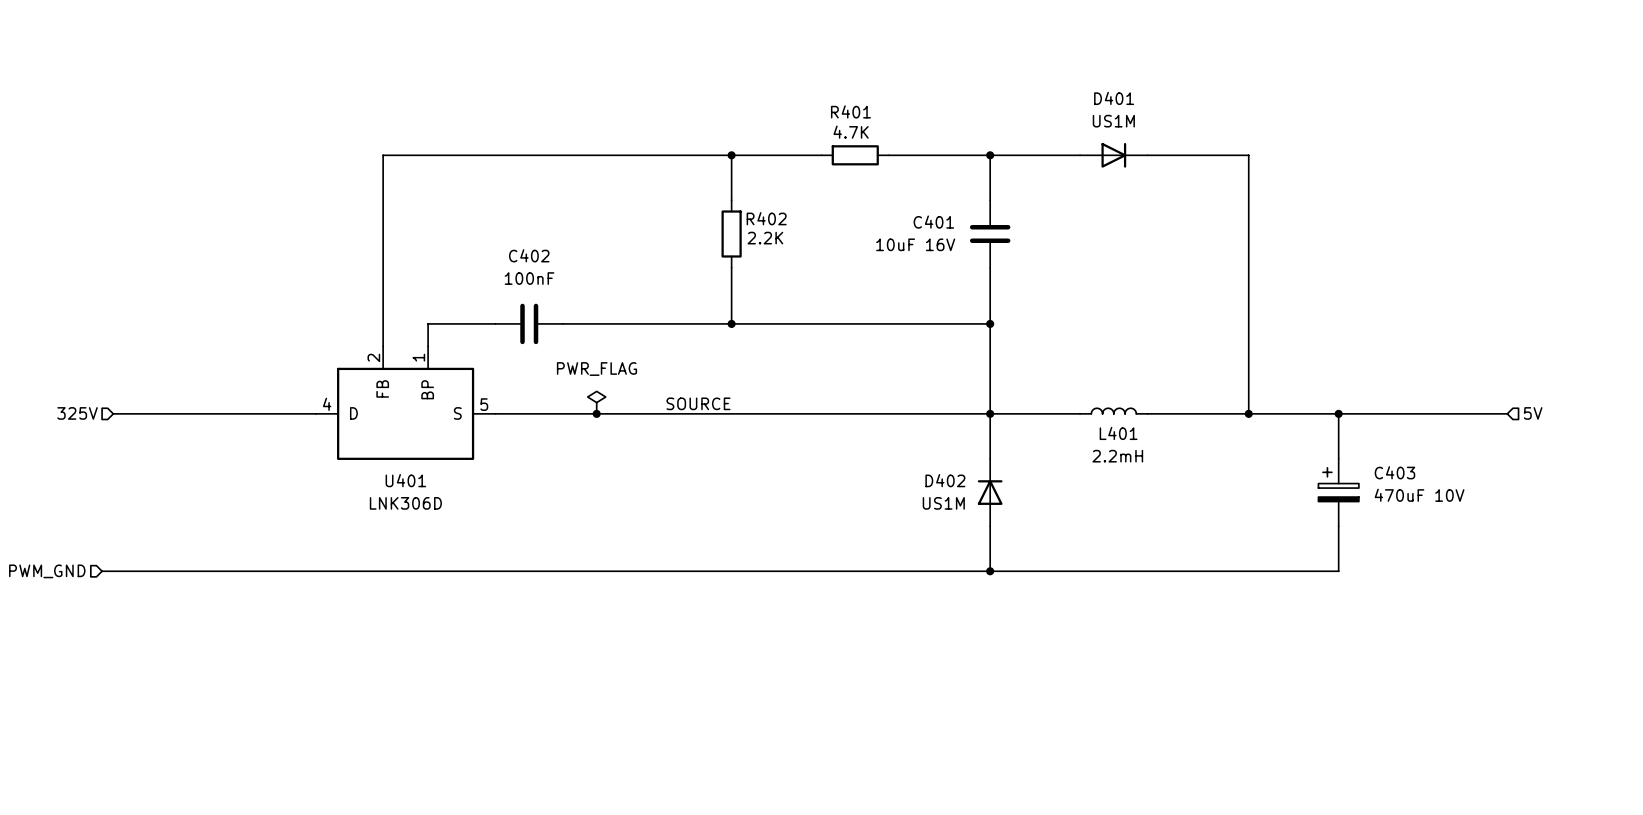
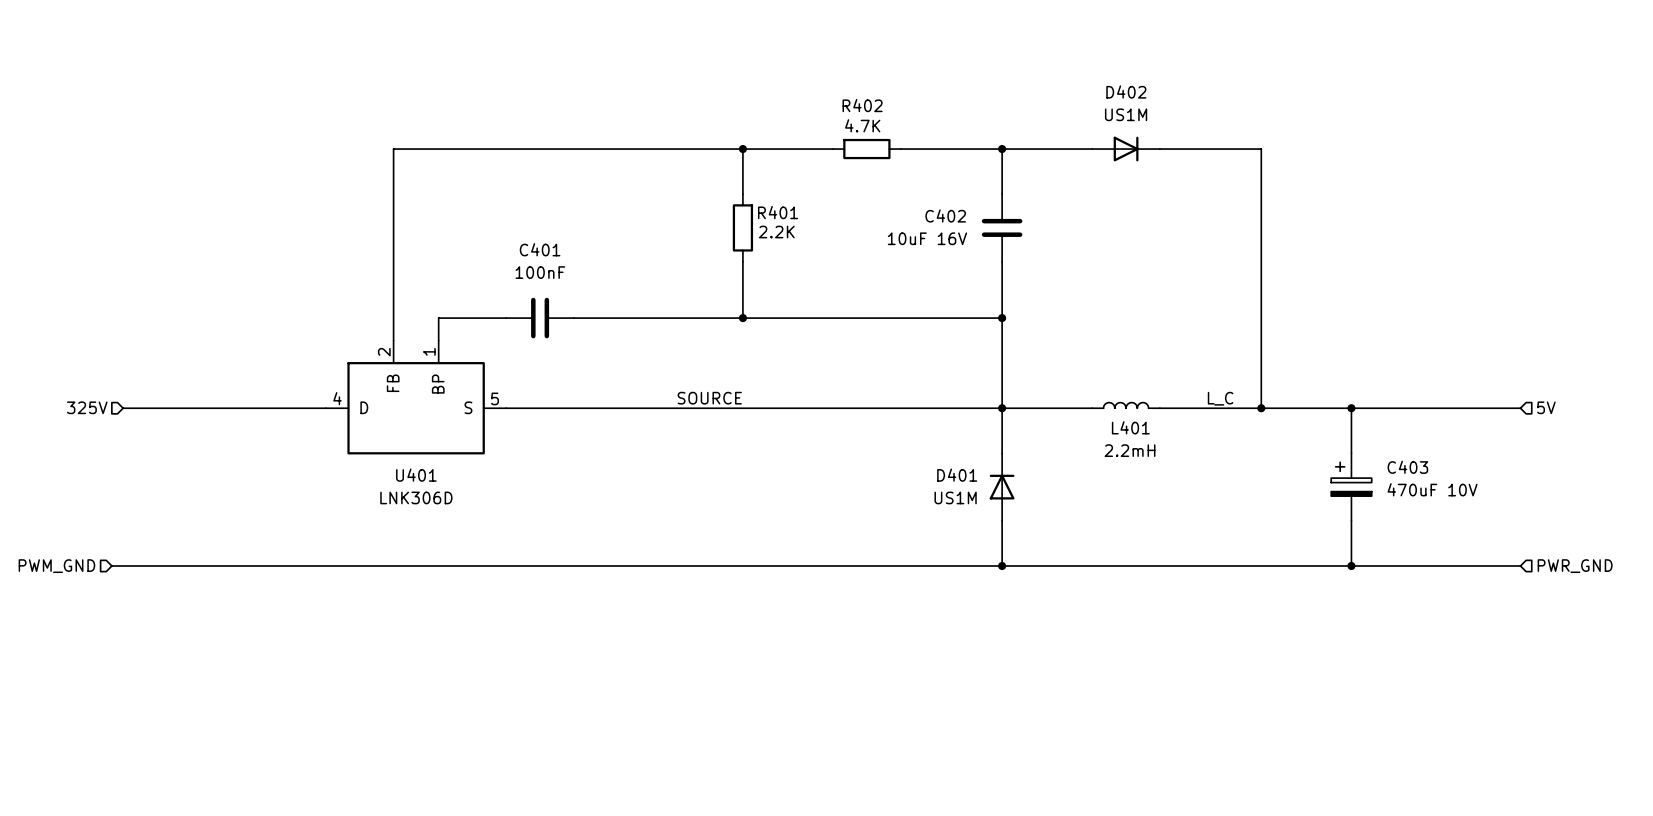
D401 name: D401 (1114, 98) -> D402 (1126, 92)
R401 name: R401 (850, 111) -> R402 (862, 105)
R402 name: R402 (766, 218) -> R401 (778, 212)
C401 name: C401 (933, 222) -> C402 (945, 215)
C402 name: C402 (529, 255) -> C401 (540, 249)
power symbol: PWR_FLAG (596, 402) -> none
label: none -> L_C (1220, 398)
junction: (596, 413) -> none
D402 name: D402 (945, 480) -> D401 (957, 475)
wire: none -> (1351, 565) (1520, 565)
junction: none -> (1351, 565)
hierarchical label: none -> PWR_GND (1575, 566)

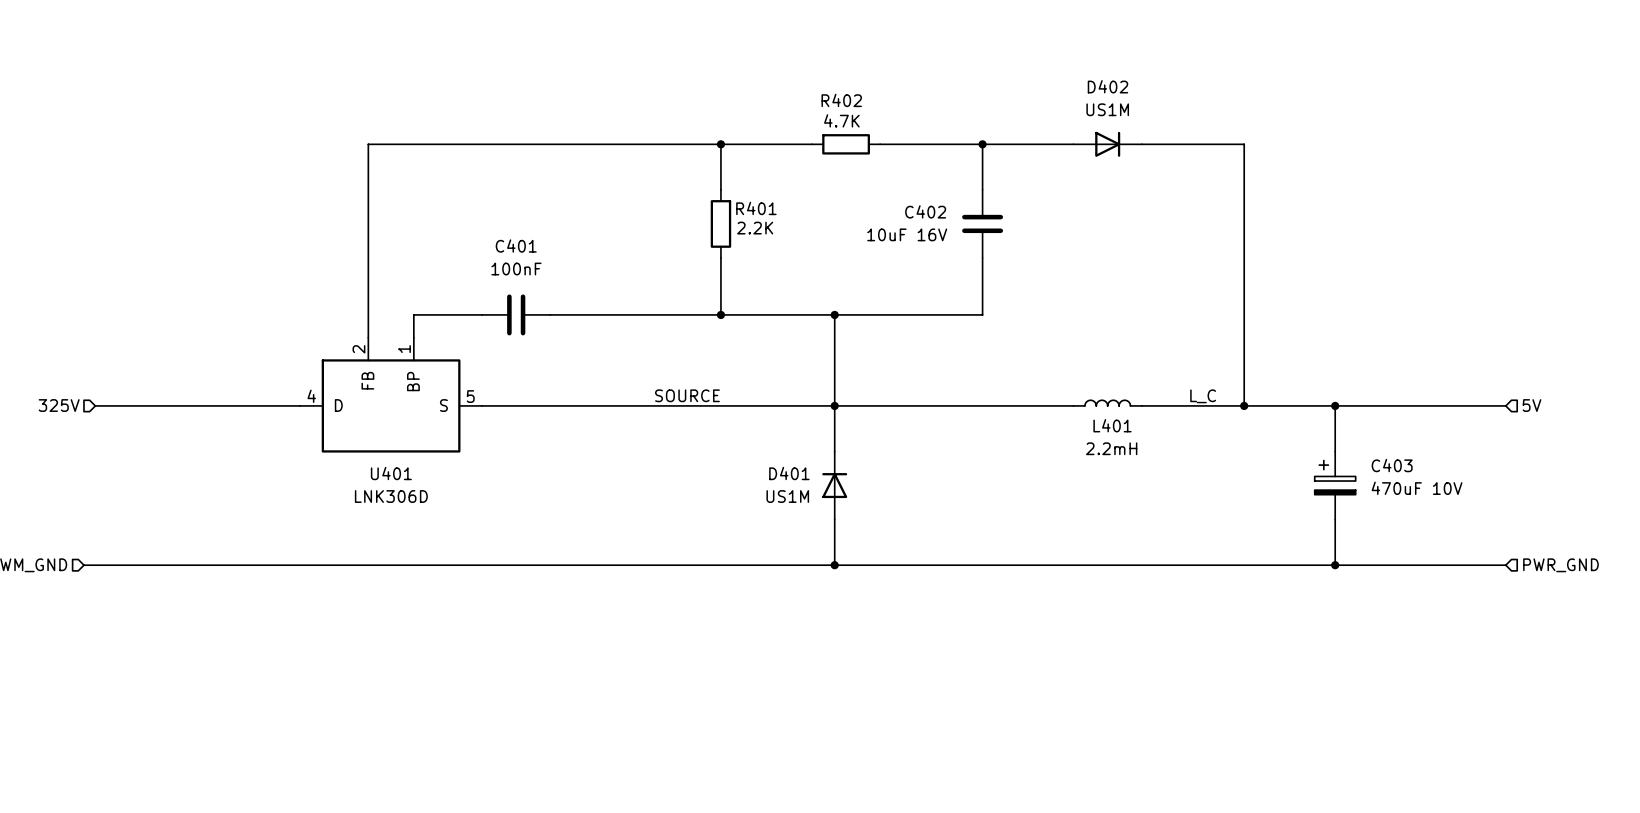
junction: none -> (834, 314)
wire: (1002, 318) (1002, 453) -> (834, 314) (834, 451)
junction: (1002, 318) -> none
junction: none -> (834, 405)
junction: (1002, 408) -> none
D401 position: (1002, 487) -> (834, 485)
wire: (1002, 520) (1002, 565) -> (834, 519) (834, 565)
junction: none -> (834, 565)
junction: (1002, 565) -> none

